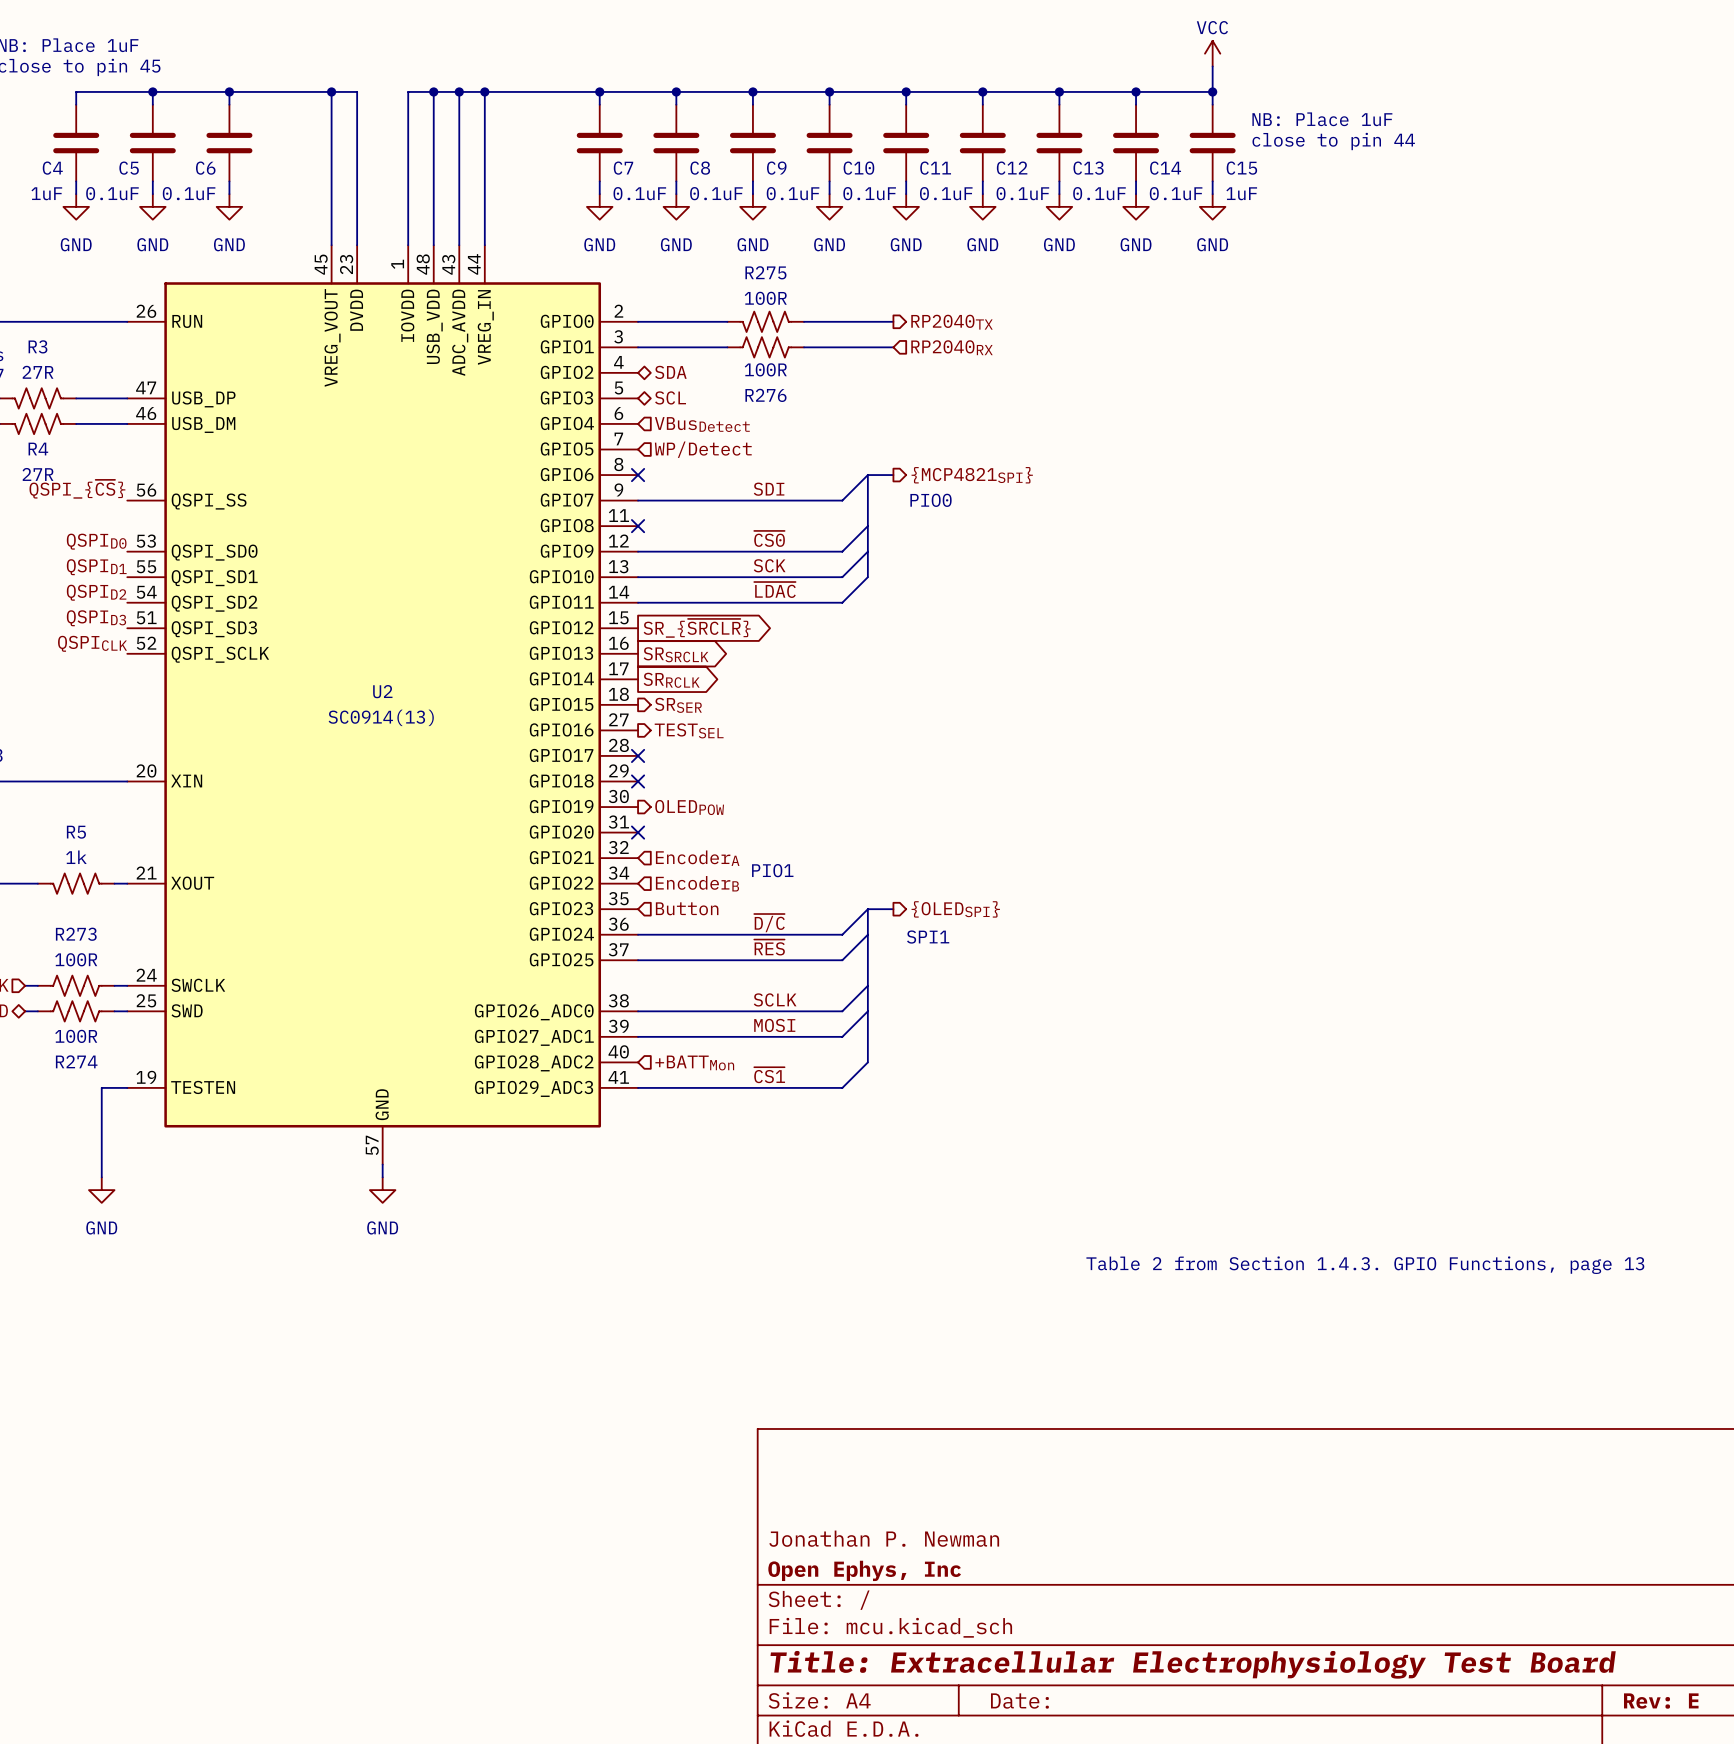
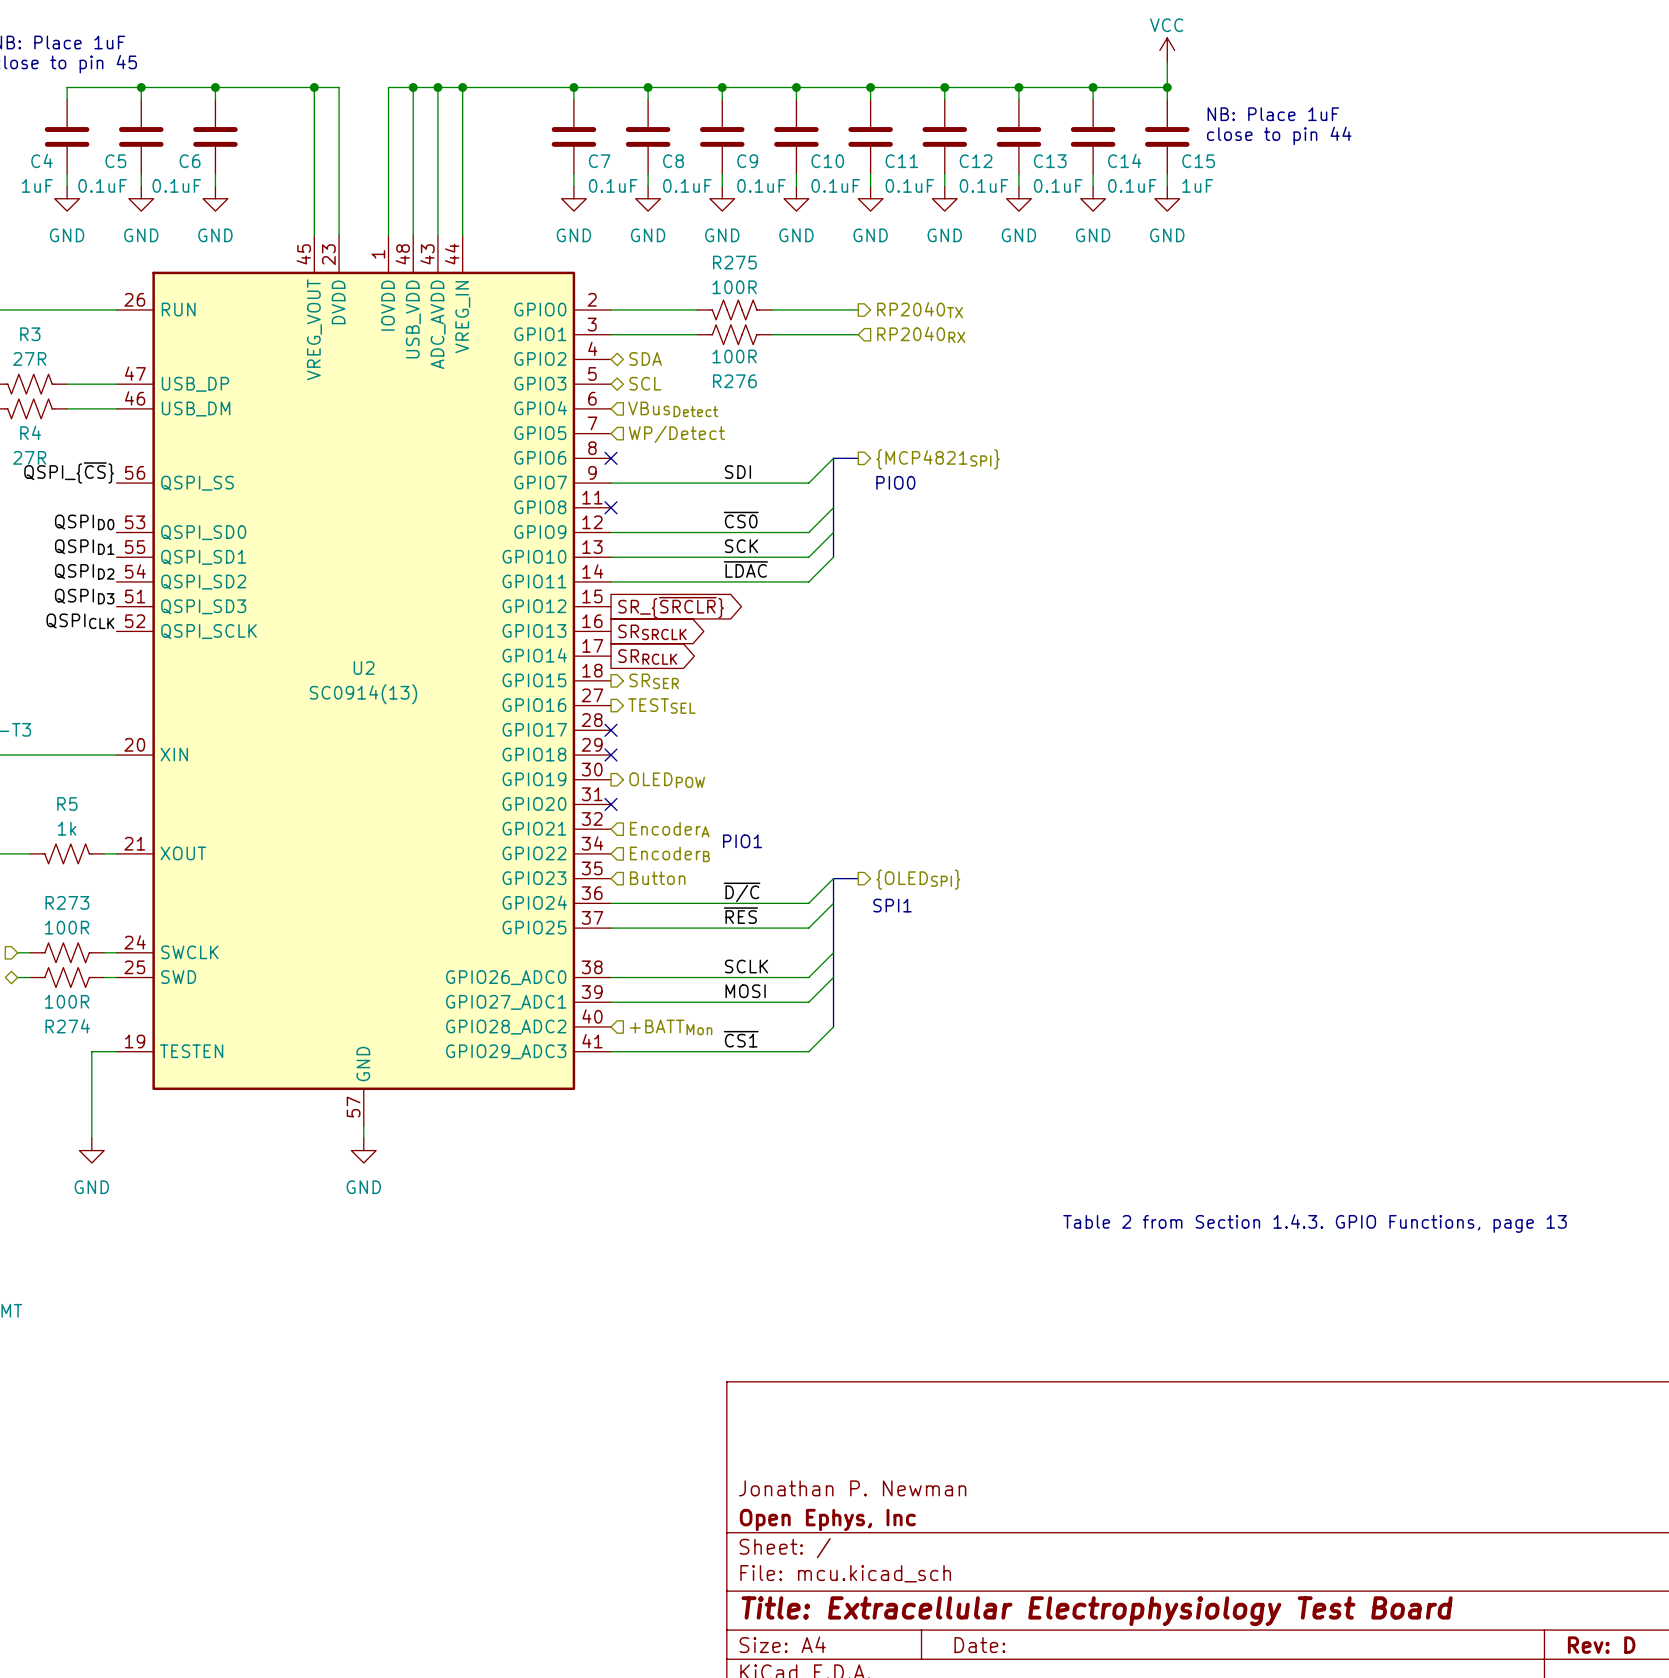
title block: Rev: E (1661, 1701) -> Rev: D (1601, 1645)

